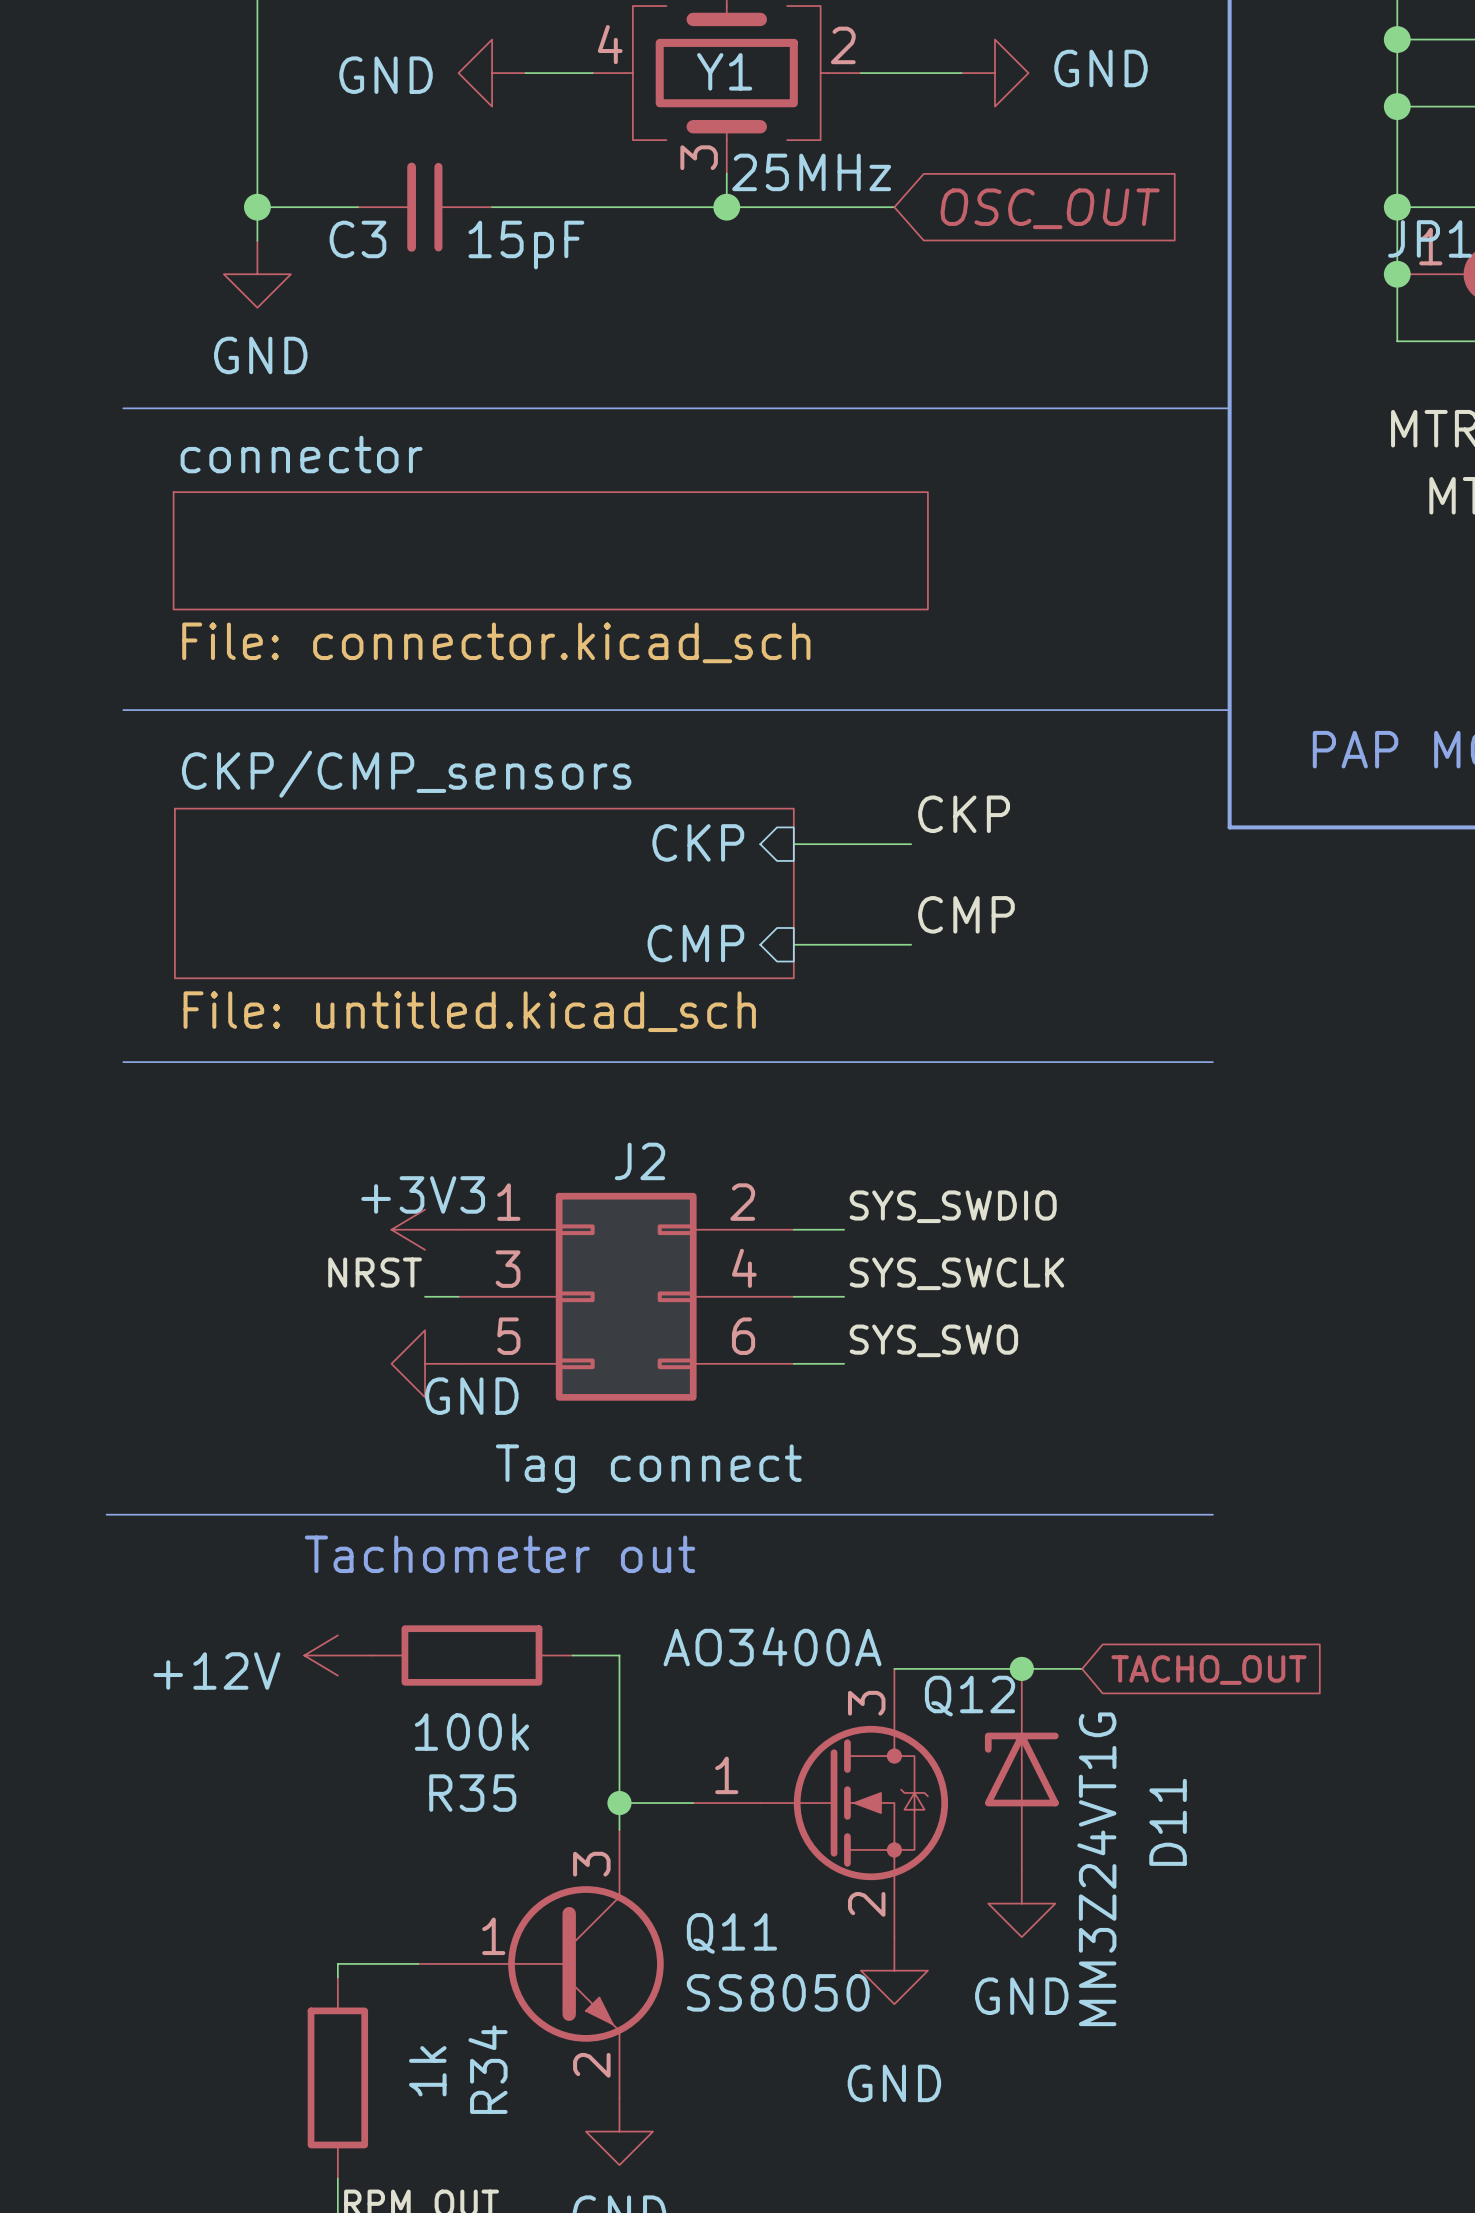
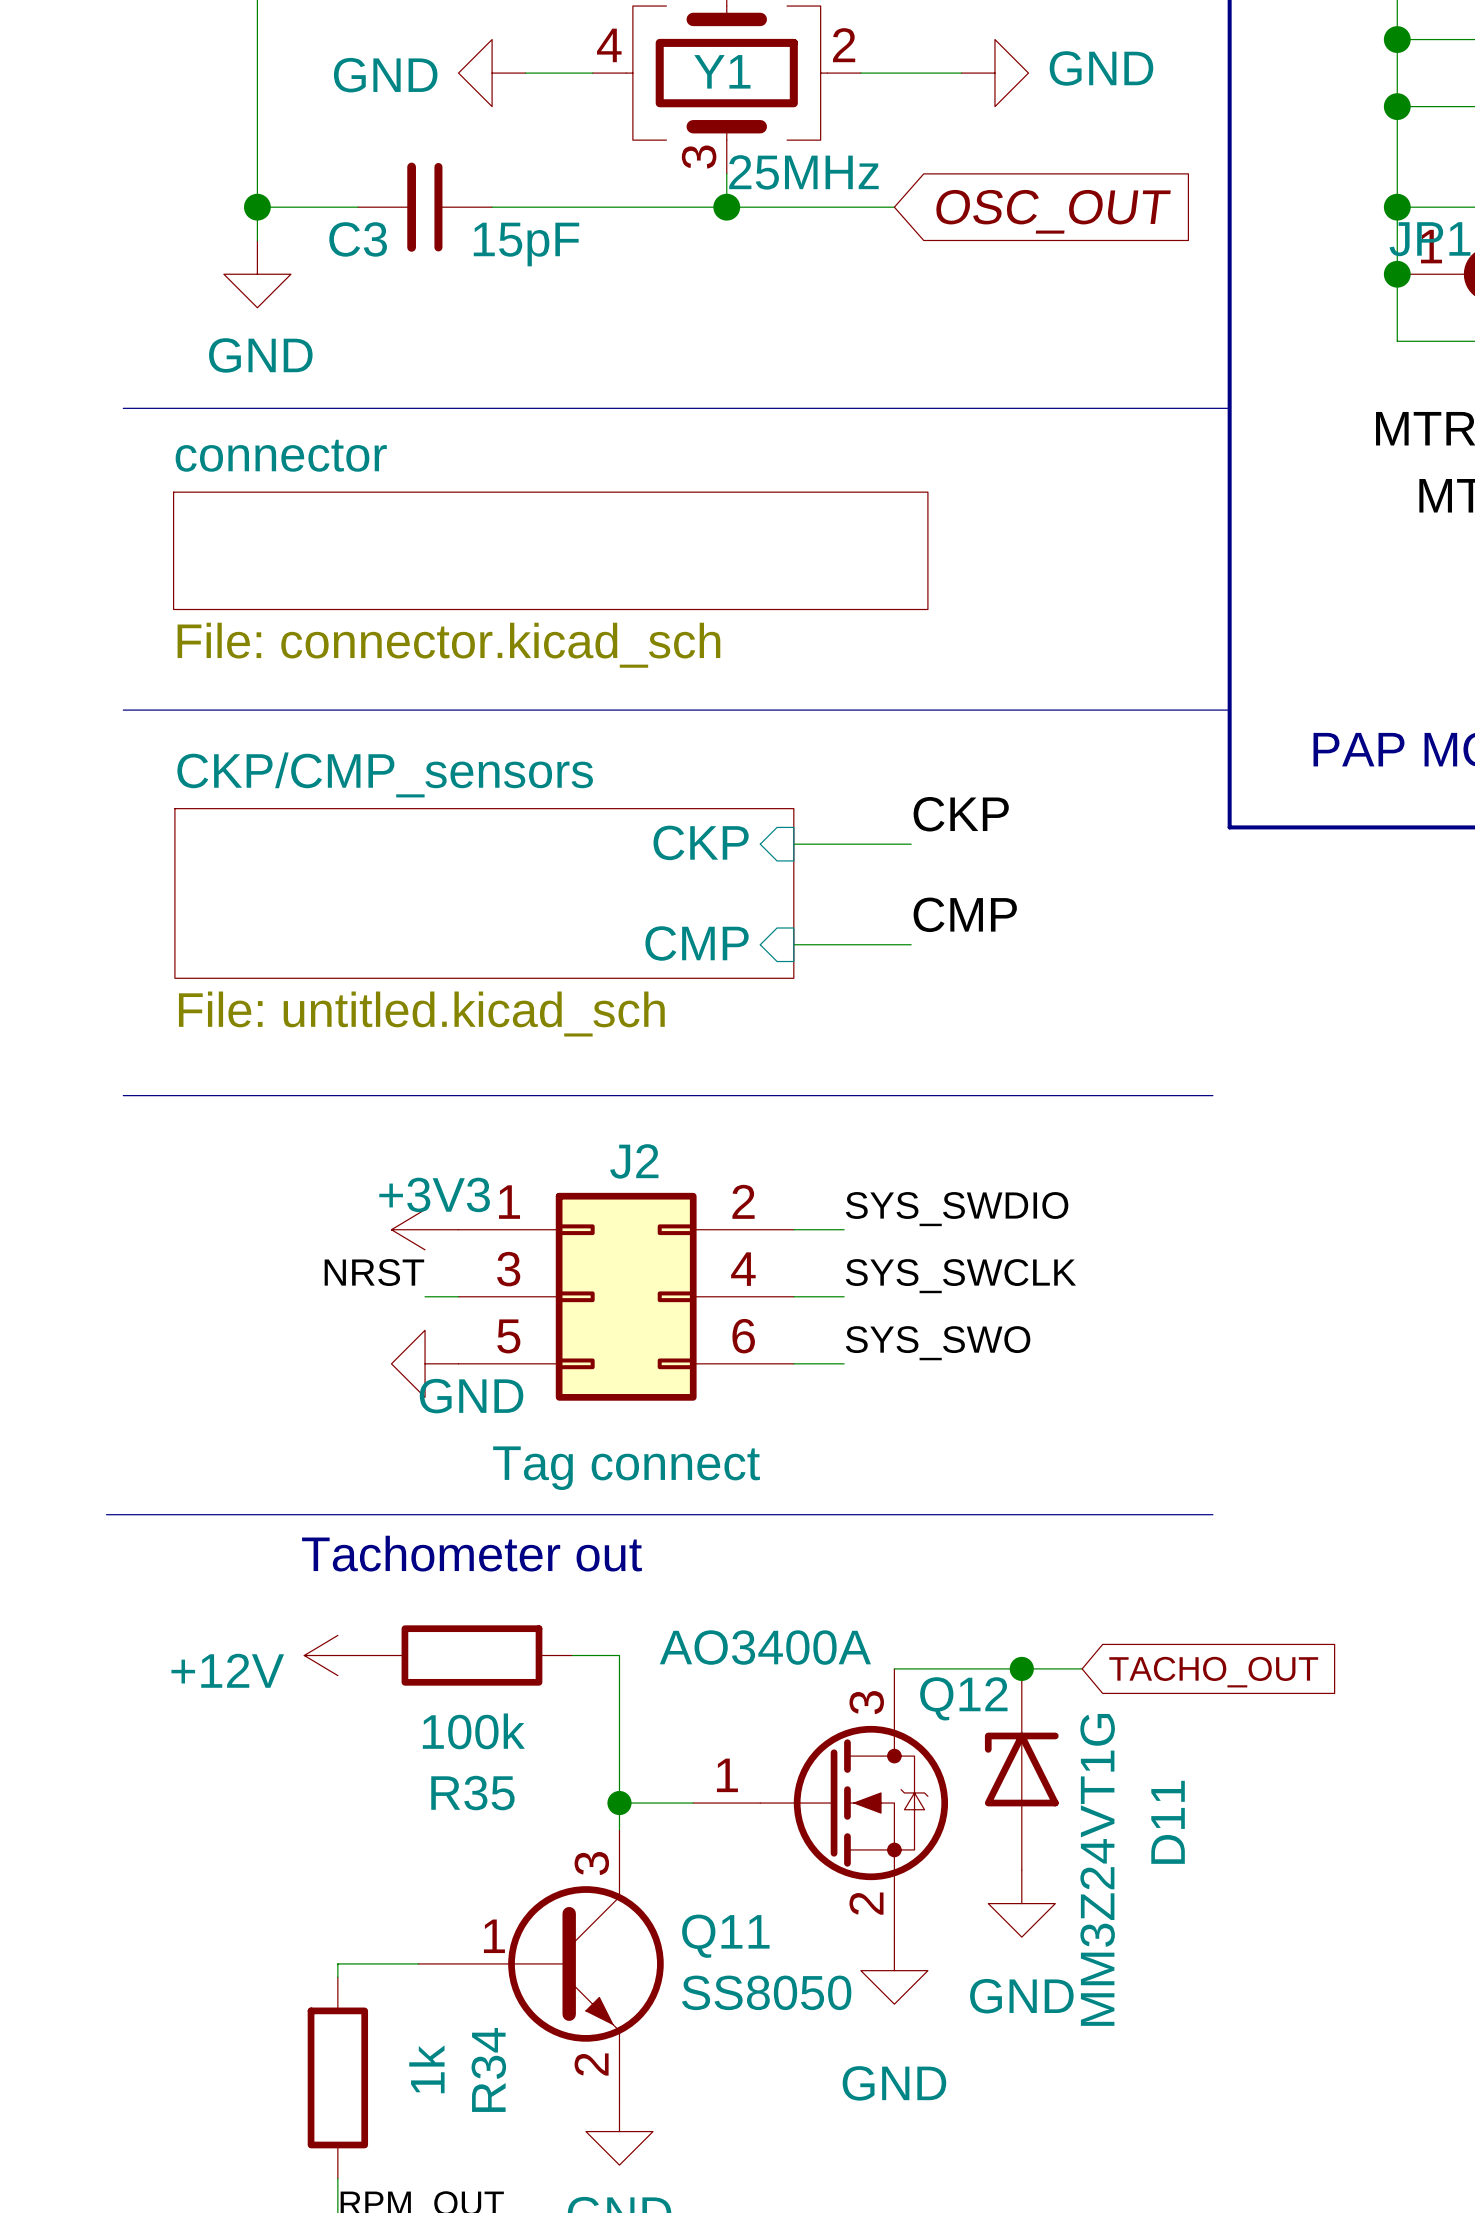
line: (123, 1062) (1212, 1062) -> (123, 1095) (1212, 1095)

